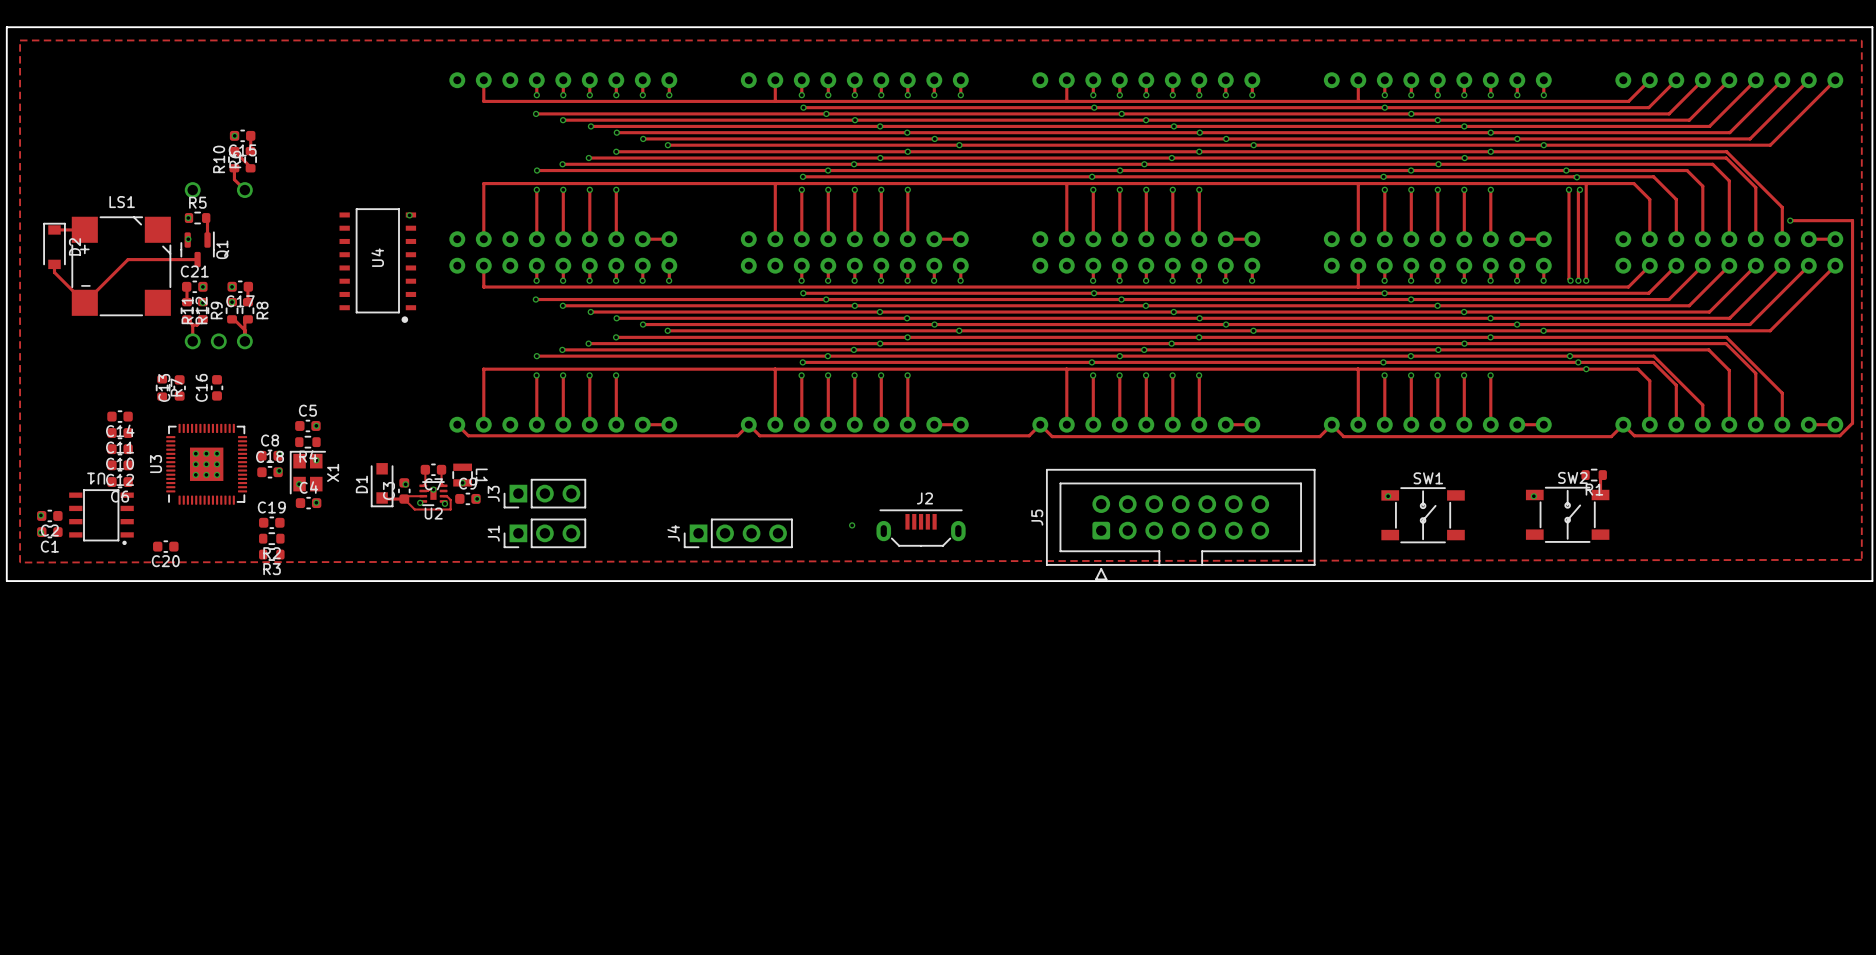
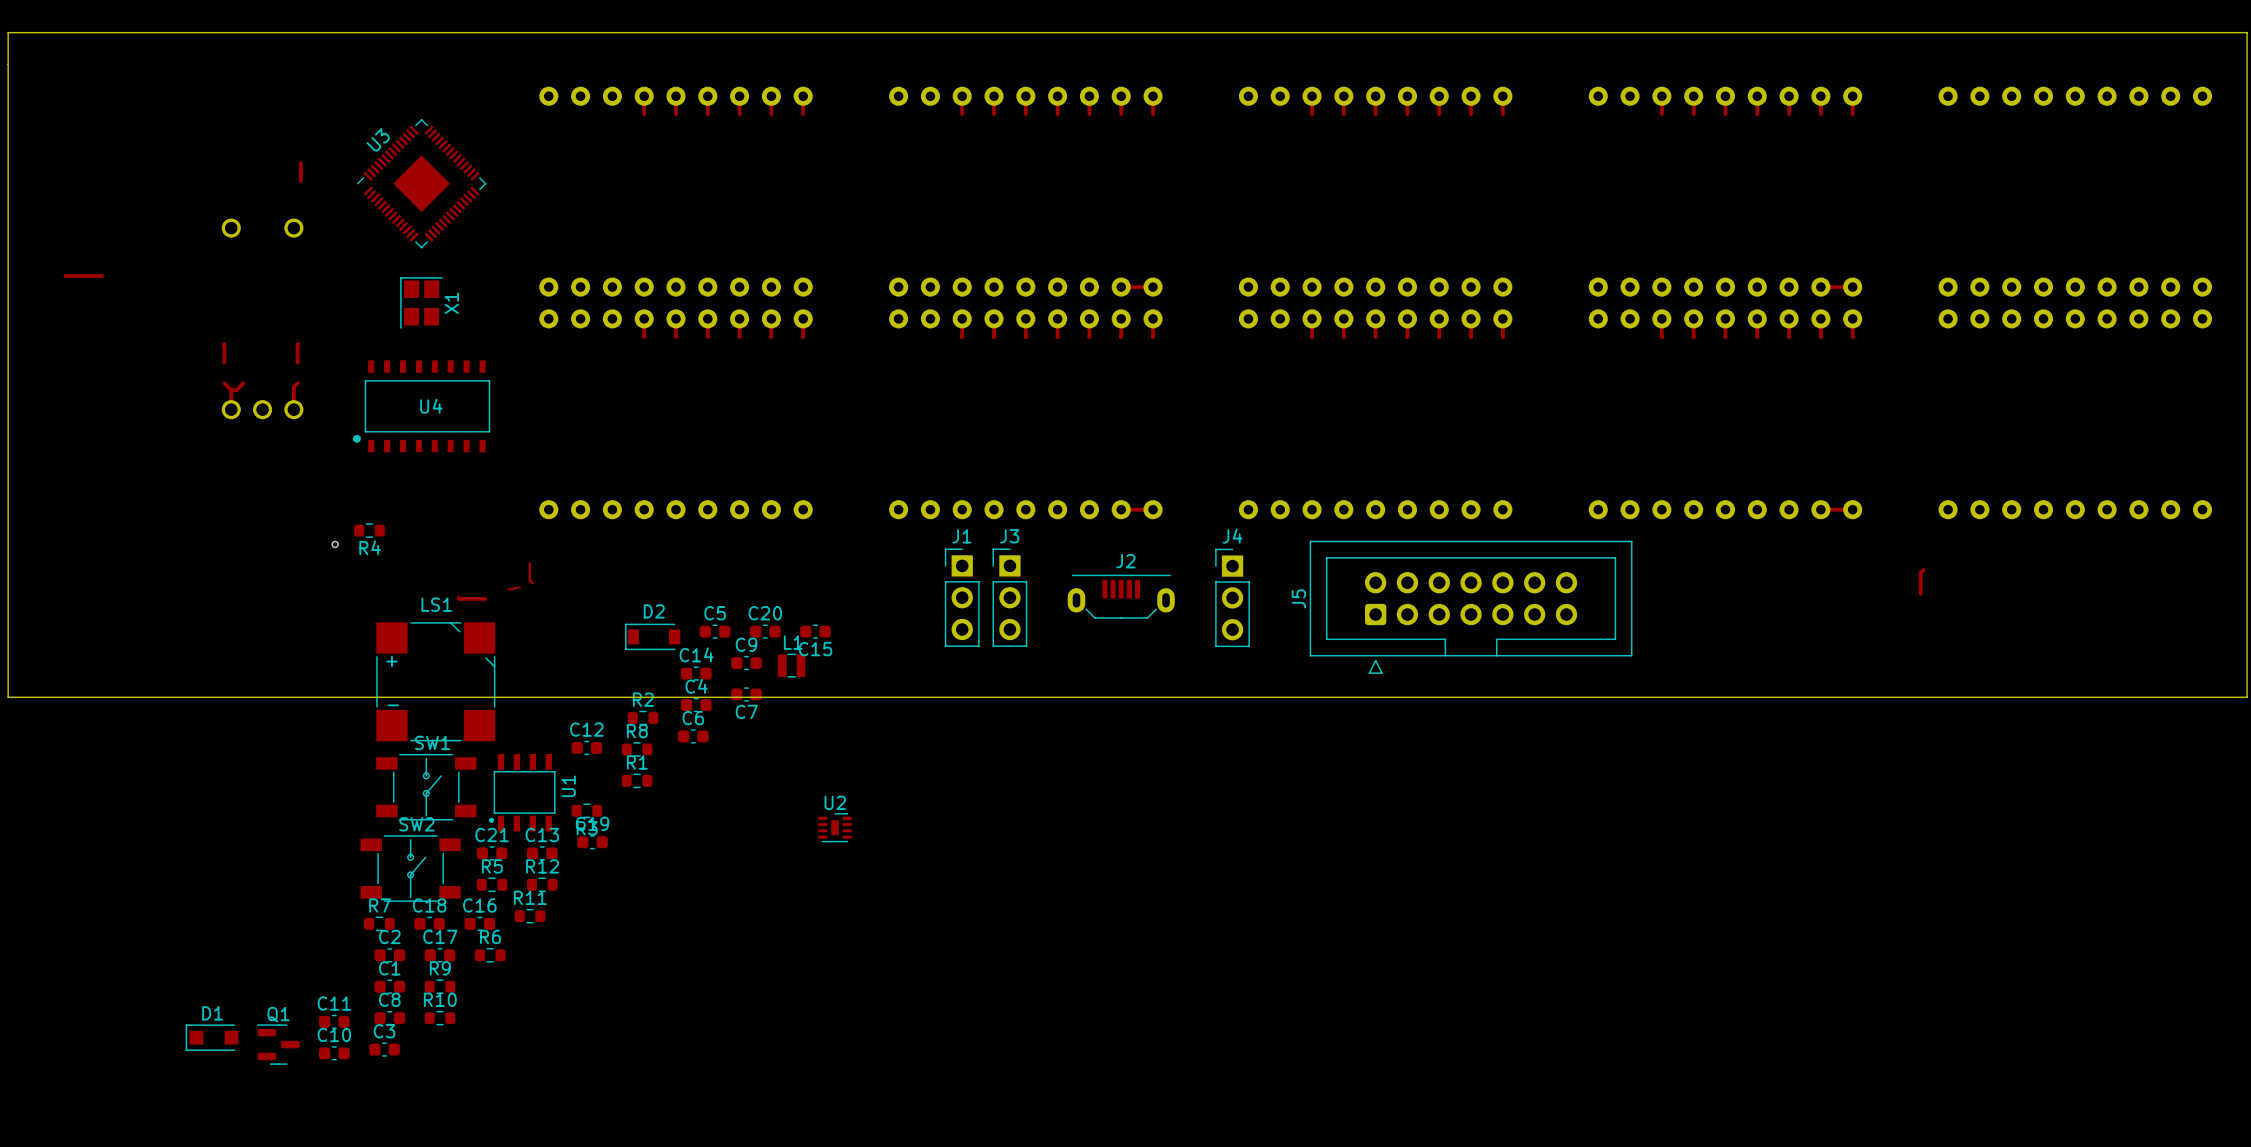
zone outline: (20, 40) (20, 562) (1861, 559) (1861, 40) (20, 40) -> none
track: (483, 80) (483, 101) (1628, 101) (1649, 80) -> none
track: (775, 80) (775, 101) -> none
track: (1066, 80) (1066, 101) -> none
track: (1358, 80) (1358, 101) -> none
track: (1676, 80) (1648, 107) (803, 107) -> none
track: (1702, 80) (1669, 113) (536, 113) -> none
track: (1729, 80) (1689, 120) (563, 120) -> none
track: (1755, 80) (1709, 126) (590, 126) -> none
track: (1782, 80) (1729, 132) (616, 132) -> none
track: (1808, 80) (1750, 138) (643, 138) -> none
track: (1835, 80) (1770, 145) (667, 145) -> none
via: (536, 95) -> none
via: (563, 95) -> none
via: (589, 95) -> none
via: (616, 95) -> none
via: (642, 95) -> none
via: (669, 95) -> none
via: (801, 95) -> none
via: (828, 95) -> none
via: (854, 95) -> none
via: (881, 95) -> none
via: (907, 95) -> none
via: (934, 95) -> none
via: (960, 95) -> none
via: (1093, 95) -> none
via: (1119, 95) -> none
via: (1146, 95) -> none
via: (1172, 95) -> none
via: (1199, 95) -> none
via: (1225, 95) -> none
via: (1252, 95) -> none
via: (1384, 95) -> none
via: (1411, 95) -> none
via: (1437, 95) -> none
via: (1464, 95) -> none
via: (1490, 95) -> none
via: (1517, 95) -> none
via: (1543, 95) -> none
via: (803, 107) -> none
via: (1094, 107) -> none
via: (1384, 107) -> none
via: (536, 113) -> none
via: (826, 113) -> none
via: (1121, 113) -> none
via: (1411, 113) -> none
via: (563, 120) -> none
via: (855, 120) -> none
via: (1146, 120) -> none
via: (1437, 120) -> none
via: (590, 126) -> none
via: (880, 126) -> none
via: (1173, 126) -> none
via: (1464, 126) -> none
via: (616, 132) -> none
via: (907, 132) -> none
via: (1199, 132) -> none
via: (1490, 132) -> none
via: (234, 135) -> none
C15 position: (242, 135) -> (815, 631)
via: (643, 138) -> none
via: (934, 138) -> none
via: (1226, 138) -> none
via: (1517, 138) -> none
via: (667, 145) -> none
via: (959, 145) -> none
via: (1253, 145) -> none
via: (1543, 145) -> none
track: (234, 151) (250, 168) -> none
track: (616, 151) (1726, 151) (1782, 207) (1782, 239) -> none
via: (616, 151) -> none
via: (907, 151) -> none
via: (1199, 151) -> none
via: (1490, 151) -> none
track: (588, 158) (1726, 158) (1755, 187) (1755, 239) -> none
via: (588, 158) -> none
via: (880, 158) -> none
via: (1171, 158) -> none
via: (1464, 158) -> none
R10 rotation: 0° (234, 159) -> 90° clockwise (439, 1018)
R10 position: (234, 159) -> (439, 1018)
R6 rotation: 0° (250, 159) -> 90° clockwise (490, 955)
R6 position: (250, 159) -> (490, 955)
track: (562, 164) (1712, 164) (1729, 180) (1729, 239) -> none
via: (562, 164) -> none
via: (854, 164) -> none
via: (1144, 164) -> none
via: (1438, 164) -> none
track: (234, 168) (234, 179) (244, 190) -> none
track: (537, 170) (1687, 170) (1702, 186) (1702, 239) -> none
via: (537, 170) -> none
via: (828, 170) -> none
via: (1120, 170) -> none
via: (1411, 170) -> none
via: (1566, 170) -> none
track: (802, 176) (1653, 176) (1676, 199) (1676, 239) -> none
via: (802, 176) -> none
via: (1092, 176) -> none
via: (1383, 176) -> none
via: (1576, 177) -> none
track: (775, 183) (775, 239) -> none
track: (1066, 183) (1066, 239) -> none
track: (1358, 183) (1358, 239) -> none
track: (1586, 183) (1586, 280) -> none
track: (536, 189) (536, 239) -> none
via: (536, 189) -> none
track: (563, 189) (563, 239) -> none
via: (563, 189) -> none
track: (589, 189) (589, 239) -> none
via: (589, 189) -> none
track: (616, 189) (616, 239) -> none
via: (616, 189) -> none
track: (801, 189) (801, 239) -> none
via: (801, 189) -> none
track: (828, 189) (828, 239) -> none
via: (828, 189) -> none
track: (854, 189) (854, 239) -> none
via: (854, 189) -> none
track: (881, 189) (881, 239) -> none
via: (881, 189) -> none
track: (907, 189) (907, 239) -> none
via: (907, 189) -> none
track: (1093, 189) (1093, 239) -> none
via: (1093, 189) -> none
track: (1119, 189) (1119, 239) -> none
via: (1119, 189) -> none
track: (1146, 189) (1146, 239) -> none
via: (1146, 189) -> none
track: (1172, 189) (1172, 239) -> none
via: (1172, 189) -> none
track: (1199, 189) (1199, 239) -> none
via: (1199, 189) -> none
track: (1384, 189) (1384, 239) -> none
via: (1384, 189) -> none
track: (1411, 189) (1411, 239) -> none
via: (1411, 189) -> none
track: (1437, 189) (1437, 239) -> none
via: (1437, 189) -> none
track: (1464, 189) (1464, 239) -> none
via: (1464, 189) -> none
track: (1490, 189) (1490, 239) -> none
via: (1490, 189) -> none
track: (1568, 189) (1568, 279) (1570, 280) -> none
via: (1568, 189) -> none
track: (1579, 189) (1578, 191) (1578, 280) -> none
via: (1579, 189) -> none
via: (409, 215) -> none
via: (188, 218) -> none
R5 position: (197, 218) -> (492, 884)
track: (206, 218) (207, 240) -> none
track: (1790, 220) (1852, 220) (1852, 423) (1839, 435) (1634, 435) (1623, 424) (1611, 436) (1343, 436) (1331, 424) (1319, 436) (1052, 436) (1040, 424) (1029, 435) (759, 435) (748, 424) (737, 435) (468, 435) (457, 424) -> none
via: (1790, 220) -> none
via: (188, 239) -> none
track: (483, 239) (483, 183) (1633, 183) (1649, 199) (1649, 239) -> none
track: (642, 239) (669, 239) -> none
track: (1225, 239) (1252, 239) -> none
track: (1808, 239) (1835, 239) -> none
D2 rotation: 0° (54, 246) -> 90° counterclockwise (652, 636)
D2 position: (54, 246) -> (652, 636)
Q1 rotation: 0° (197, 249) -> 90° counterclockwise (278, 1044)
Q1 position: (197, 249) -> (278, 1044)
track: (197, 259) (128, 259) (84, 302) (54, 272) (54, 264) -> none
U4 rotation: 0° (377, 265) -> 90° clockwise (421, 406)
U4 position: (377, 265) -> (421, 406)
track: (483, 265) (483, 286) -> none
track: (1358, 265) (1358, 286) -> none
track: (1649, 265) (1628, 287) (483, 287) -> none
track: (1676, 265) (1648, 293) (803, 293) -> none
track: (1702, 265) (1668, 299) (535, 299) -> none
track: (1729, 265) (1689, 305) (562, 305) -> none
track: (1755, 265) (1709, 312) (590, 312) -> none
track: (1782, 265) (1729, 318) (616, 318) -> none
track: (1808, 265) (1749, 324) (643, 324) -> none
track: (1835, 265) (1770, 330) (667, 330) -> none
LS1 position: (121, 266) -> (435, 681)
via: (536, 280) -> none
via: (563, 280) -> none
via: (589, 280) -> none
via: (616, 280) -> none
via: (642, 280) -> none
via: (669, 280) -> none
via: (801, 280) -> none
via: (828, 280) -> none
via: (854, 280) -> none
via: (881, 280) -> none
via: (907, 280) -> none
via: (934, 280) -> none
via: (960, 280) -> none
via: (1093, 280) -> none
via: (1119, 280) -> none
via: (1146, 280) -> none
via: (1172, 280) -> none
via: (1199, 280) -> none
via: (1225, 280) -> none
via: (1252, 280) -> none
via: (1384, 280) -> none
via: (1411, 280) -> none
via: (1437, 280) -> none
via: (1464, 280) -> none
via: (1490, 280) -> none
via: (1517, 280) -> none
via: (1543, 280) -> none
via: (1570, 280) -> none
via: (1578, 280) -> none
via: (1586, 280) -> none
C21 position: (194, 286) -> (492, 853)
via: (202, 286) -> none
via: (232, 286) -> none
C17 position: (240, 286) -> (439, 955)
via: (803, 293) -> none
via: (1094, 293) -> none
via: (1384, 293) -> none
via: (535, 299) -> none
via: (826, 299) -> none
via: (1121, 299) -> none
via: (1411, 299) -> none
C17 name position: C17 (240, 301) -> C17 (440, 936)
via: (202, 302) -> none
via: (232, 302) -> none
via: (562, 305) -> none
via: (854, 305) -> none
via: (1145, 305) -> none
via: (1437, 305) -> none
R12 rotation: 0° (187, 310) -> 90° clockwise (542, 884)
R12 position: (187, 310) -> (542, 884)
R12 name position: R12 (201, 310) -> R12 (542, 866)
R11 rotation: 0° (202, 310) -> 90° clockwise (530, 916)
R11 position: (202, 310) -> (530, 916)
R9 rotation: 0° (232, 310) -> 90° clockwise (439, 986)
R9 position: (232, 310) -> (439, 986)
R8 rotation: 0° (247, 310) -> 90° clockwise (637, 749)
R8 position: (247, 310) -> (637, 749)
R8 name position: R8 (262, 310) -> R8 (637, 731)
via: (590, 312) -> none
via: (879, 312) -> none
via: (1173, 312) -> none
via: (1464, 312) -> none
via: (616, 318) -> none
via: (907, 318) -> none
via: (1199, 318) -> none
via: (1490, 318) -> none
track: (232, 319) (244, 330) -> none
via: (643, 324) -> none
via: (934, 324) -> none
via: (1226, 324) -> none
via: (1517, 324) -> none
via: (667, 330) -> none
via: (959, 330) -> none
via: (1253, 330) -> none
via: (1543, 330) -> none
track: (616, 337) (1726, 337) (1782, 393) (1782, 424) -> none
via: (616, 337) -> none
via: (907, 337) -> none
via: (1199, 337) -> none
via: (1490, 337) -> none
track: (588, 343) (1726, 343) (1755, 373) (1755, 424) -> none
via: (588, 343) -> none
via: (880, 343) -> none
via: (1171, 343) -> none
via: (1464, 343) -> none
track: (562, 349) (1708, 349) (1729, 370) (1729, 424) -> none
via: (562, 349) -> none
via: (853, 349) -> none
via: (1144, 349) -> none
via: (1438, 349) -> none
track: (536, 356) (1653, 356) (1702, 405) (1702, 424) -> none
via: (536, 356) -> none
via: (827, 356) -> none
via: (1119, 356) -> none
via: (1410, 356) -> none
via: (1569, 356) -> none
track: (802, 362) (1653, 362) (1676, 385) (1676, 424) -> none
via: (802, 362) -> none
via: (1091, 362) -> none
via: (1383, 362) -> none
via: (1578, 362) -> none
track: (775, 369) (775, 424) -> none
track: (1066, 369) (1066, 424) -> none
track: (1358, 369) (1358, 424) -> none
via: (1586, 369) -> none
track: (536, 375) (536, 424) -> none
via: (536, 375) -> none
track: (563, 375) (563, 424) -> none
via: (563, 375) -> none
track: (589, 375) (589, 424) -> none
via: (589, 375) -> none
track: (616, 375) (616, 424) -> none
via: (616, 375) -> none
track: (801, 375) (801, 424) -> none
via: (801, 375) -> none
track: (828, 375) (828, 424) -> none
via: (828, 375) -> none
track: (854, 375) (854, 424) -> none
via: (854, 375) -> none
track: (881, 375) (881, 424) -> none
via: (881, 375) -> none
track: (907, 375) (907, 424) -> none
via: (907, 375) -> none
track: (1093, 375) (1093, 424) -> none
via: (1093, 375) -> none
track: (1119, 375) (1119, 424) -> none
via: (1119, 375) -> none
track: (1146, 375) (1146, 424) -> none
via: (1146, 375) -> none
track: (1172, 375) (1172, 424) -> none
via: (1172, 375) -> none
track: (1199, 375) (1199, 424) -> none
via: (1199, 375) -> none
track: (1384, 375) (1384, 424) -> none
via: (1384, 375) -> none
track: (1411, 375) (1411, 424) -> none
via: (1411, 375) -> none
track: (1437, 375) (1437, 424) -> none
via: (1437, 375) -> none
track: (1464, 375) (1464, 424) -> none
via: (1464, 375) -> none
track: (1490, 375) (1490, 424) -> none
via: (1490, 375) -> none
R7 rotation: 0° (162, 387) -> 90° clockwise (379, 923)
R7 position: (162, 387) -> (379, 923)
R7 name position: R7 (176, 387) -> R7 (379, 905)
C13 rotation: 0° (179, 387) -> 90° clockwise (542, 853)
C13 position: (179, 387) -> (542, 853)
C16 rotation: 0° (217, 387) -> 90° clockwise (479, 923)
C16 position: (217, 387) -> (479, 923)
C14 position: (120, 416) -> (696, 673)
track: (483, 424) (483, 369) (1637, 369) (1649, 380) (1649, 424) -> none
track: (642, 424) (669, 424) -> none
track: (1225, 424) (1252, 424) -> none
track: (1808, 424) (1835, 424) -> none
C5 position: (307, 425) -> (715, 631)
via: (316, 425) -> none
C14 name position: C14 (120, 430) -> C14 (696, 654)
C11 position: (120, 433) -> (334, 1021)
C11 name position: C11 (120, 447) -> C11 (334, 1003)
C10 position: (120, 449) -> (334, 1053)
via: (195, 453) -> none
via: (206, 453) -> none
via: (217, 453) -> none
C8 position: (270, 455) -> (389, 1018)
via: (316, 460) -> none
C10 name position: C10 (120, 463) -> C10 (334, 1034)
via: (195, 464) -> none
U3 rotation: 0° (206, 464) -> 45° clockwise (421, 183)
U3 position: (206, 464) -> (421, 183)
via: (206, 464) -> none
via: (217, 464) -> none
C12 position: (120, 465) -> (586, 747)
track: (425, 469) (425, 483) (423, 485) -> none
C7 position: (433, 469) -> (746, 694)
via: (279, 470) -> none
C18 position: (270, 472) -> (429, 923)
X1 position: (307, 472) -> (421, 302)
via: (195, 474) -> none
via: (206, 474) -> none
via: (217, 474) -> none
L1 rotation: 0° (462, 475) -> 90° clockwise (791, 665)
L1 position: (462, 475) -> (791, 665)
R1 position: (1594, 475) -> (637, 780)
L1 name position: L1 (481, 476) -> L1 (793, 642)
C12 name position: C12 (120, 479) -> C12 (586, 729)
C6 position: (120, 482) -> (693, 736)
via: (462, 482) -> none
via: (299, 484) -> none
via: (405, 484) -> none
D1 rotation: 0° (382, 485) -> 90° clockwise (211, 1037)
D1 position: (382, 485) -> (211, 1037)
via: (433, 489) -> none
R1 name position: R1 (1594, 489) -> R1 (637, 762)
C3 rotation: 0° (404, 490) -> 90° clockwise (384, 1049)
C3 position: (404, 490) -> (384, 1049)
U2 rotation: 0° (433, 493) -> 180° (835, 827)
U2 position: (433, 493) -> (835, 827)
J3 rotation: 0° (544, 493) -> 90° clockwise (1009, 597)
J3 position: (544, 493) -> (1009, 597)
C6 name position: C6 (120, 496) -> C6 (693, 718)
track: (423, 496) (407, 496) (404, 499) (414, 509) (450, 509) (450, 499) (446, 496) (443, 496) -> none
via: (1388, 496) -> none
via: (1533, 496) -> none
C9 position: (467, 498) -> (746, 663)
via: (477, 498) -> none
via: (316, 502) -> none
via: (420, 502) -> none
C4 position: (308, 503) -> (696, 705)
via: (444, 503) -> none
SW2 position: (1567, 514) -> (410, 868)
via: (40, 515) -> none
C2 position: (49, 515) -> (389, 955)
SW1 position: (1423, 515) -> (426, 787)
U1 rotation: 0° (101, 517) -> 90° clockwise (522, 792)
U1 position: (101, 517) -> (522, 792)
J4 footprint: [684, 518, 793, 548] -> [1215, 548, 1250, 648]
C19 position: (271, 522) -> (592, 842)
J5 position: (1180, 524) -> (1471, 607)
via: (852, 525) -> none
J2 position: (921, 528) -> (1121, 596)
C2 name position: C2 (49, 530) -> C2 (389, 936)
via: (40, 532) -> none
C1 position: (49, 532) -> (389, 986)
J1 rotation: 0° (544, 533) -> 90° clockwise (962, 597)
J1 position: (544, 533) -> (962, 597)
J4 name position: J4 (673, 533) -> J4 (1232, 536)
R2 position: (271, 538) -> (643, 718)
C1 name position: C1 (49, 546) -> C1 (389, 968)
C20 position: (165, 546) -> (765, 631)
R2 name position: R2 (272, 553) -> R2 (643, 699)
R3 position: (271, 554) -> (586, 810)
C20 name position: C20 (165, 561) -> C20 (765, 613)

